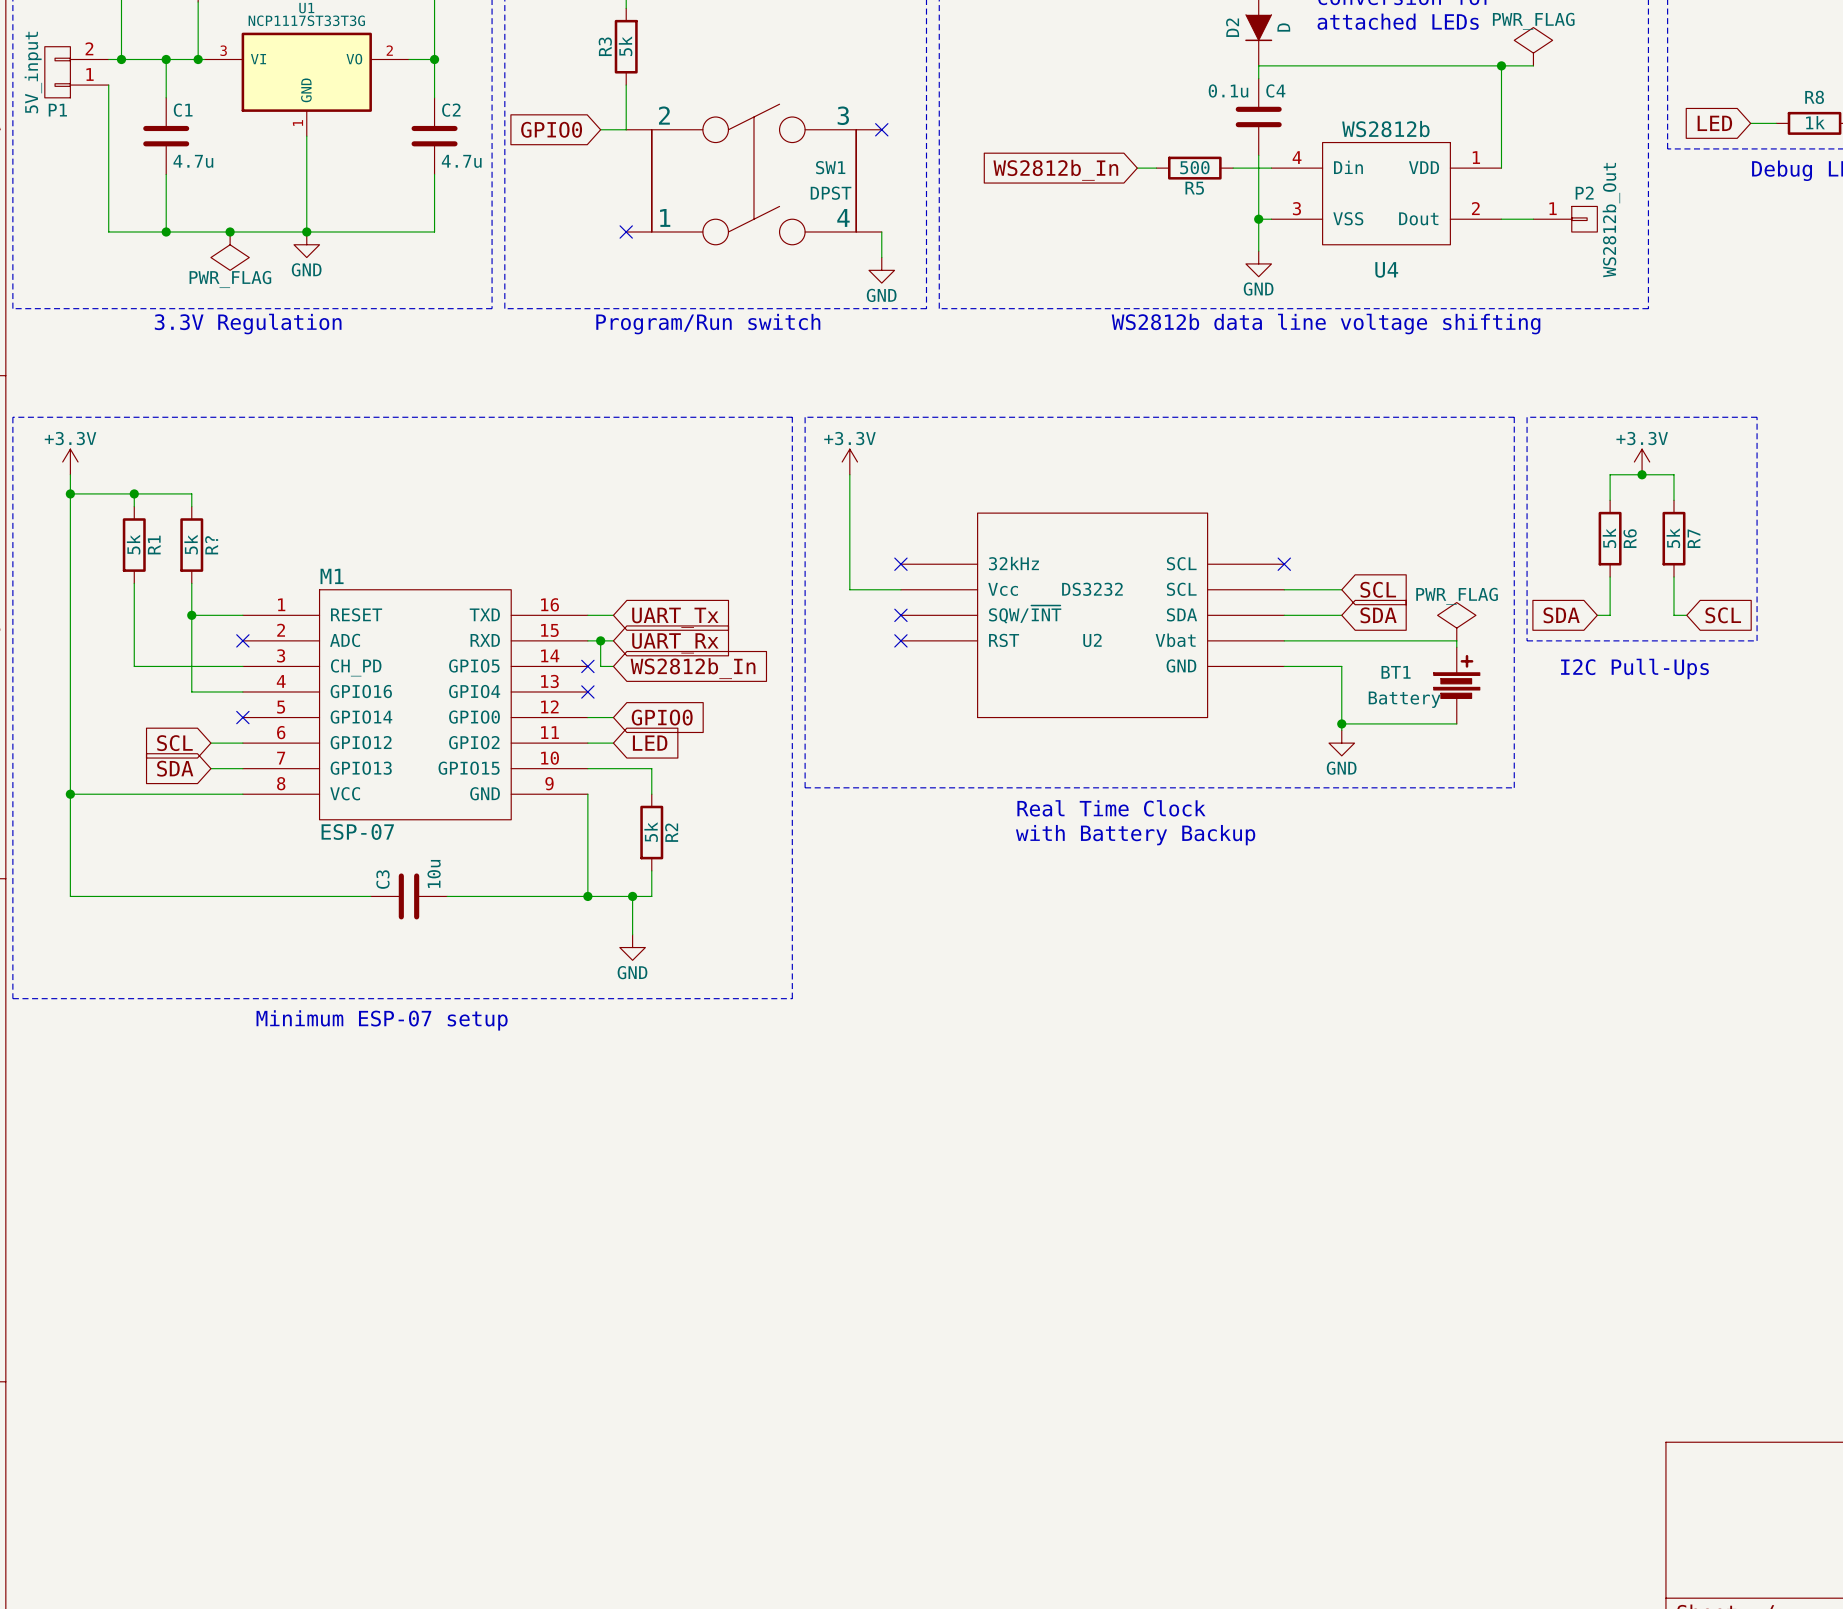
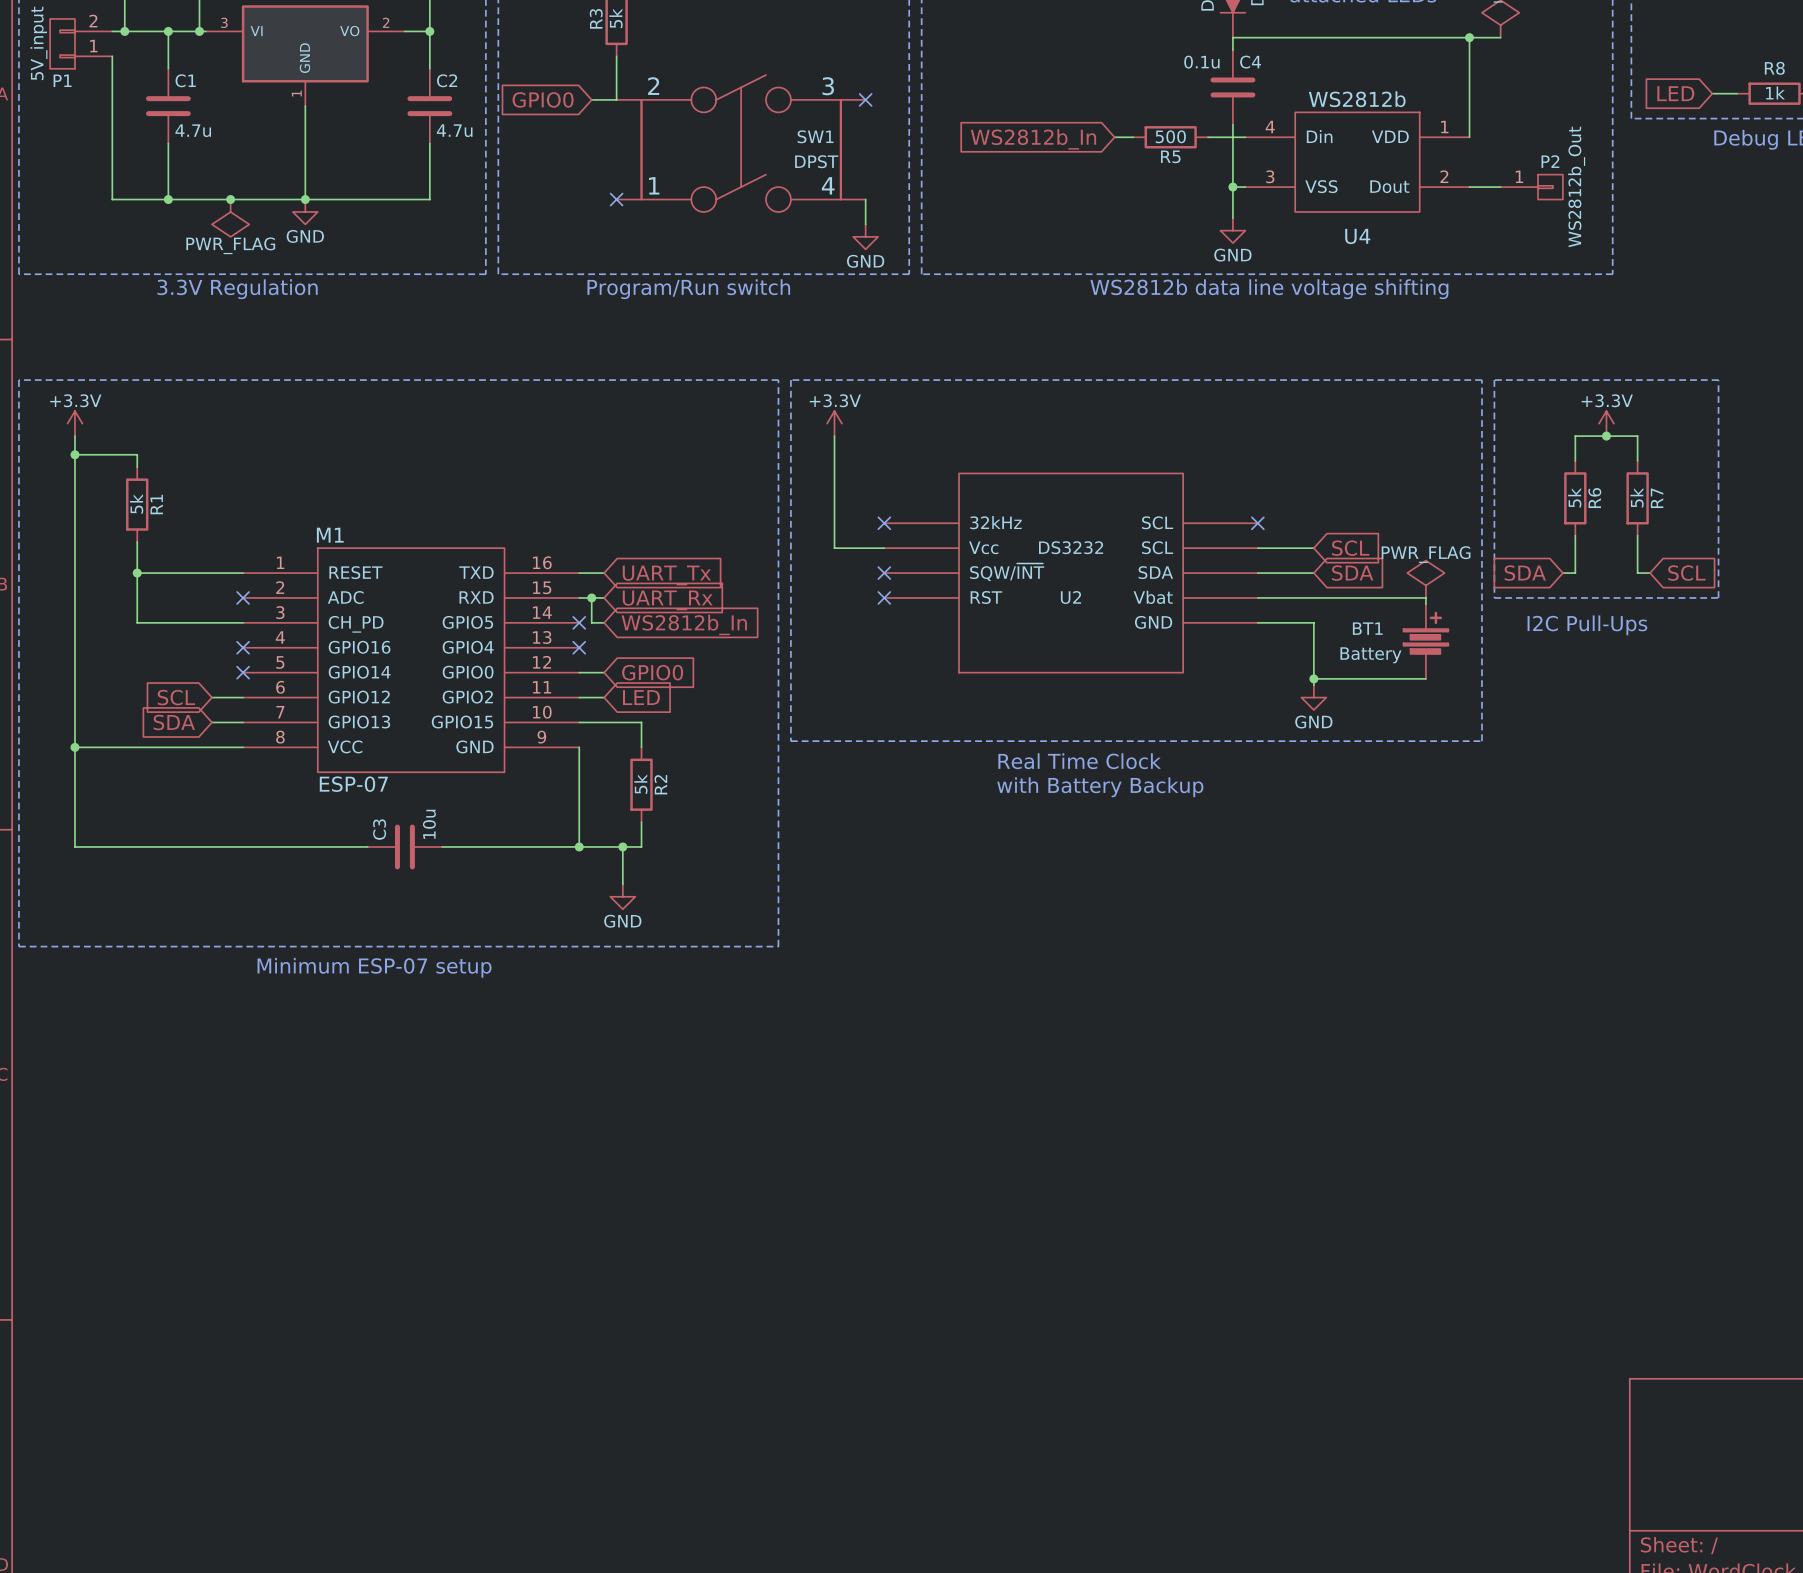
wire: (134, 493) (191, 493) (191, 506) -> none
junction: (134, 493) -> none
R?: 5k (191, 545) -> none
wire: (191, 583) (191, 691) (242, 691) -> none
wire: none -> (137, 573) (193, 573)
junction position: (191, 615) -> (137, 573)
no-connect mark: none -> (243, 647)

